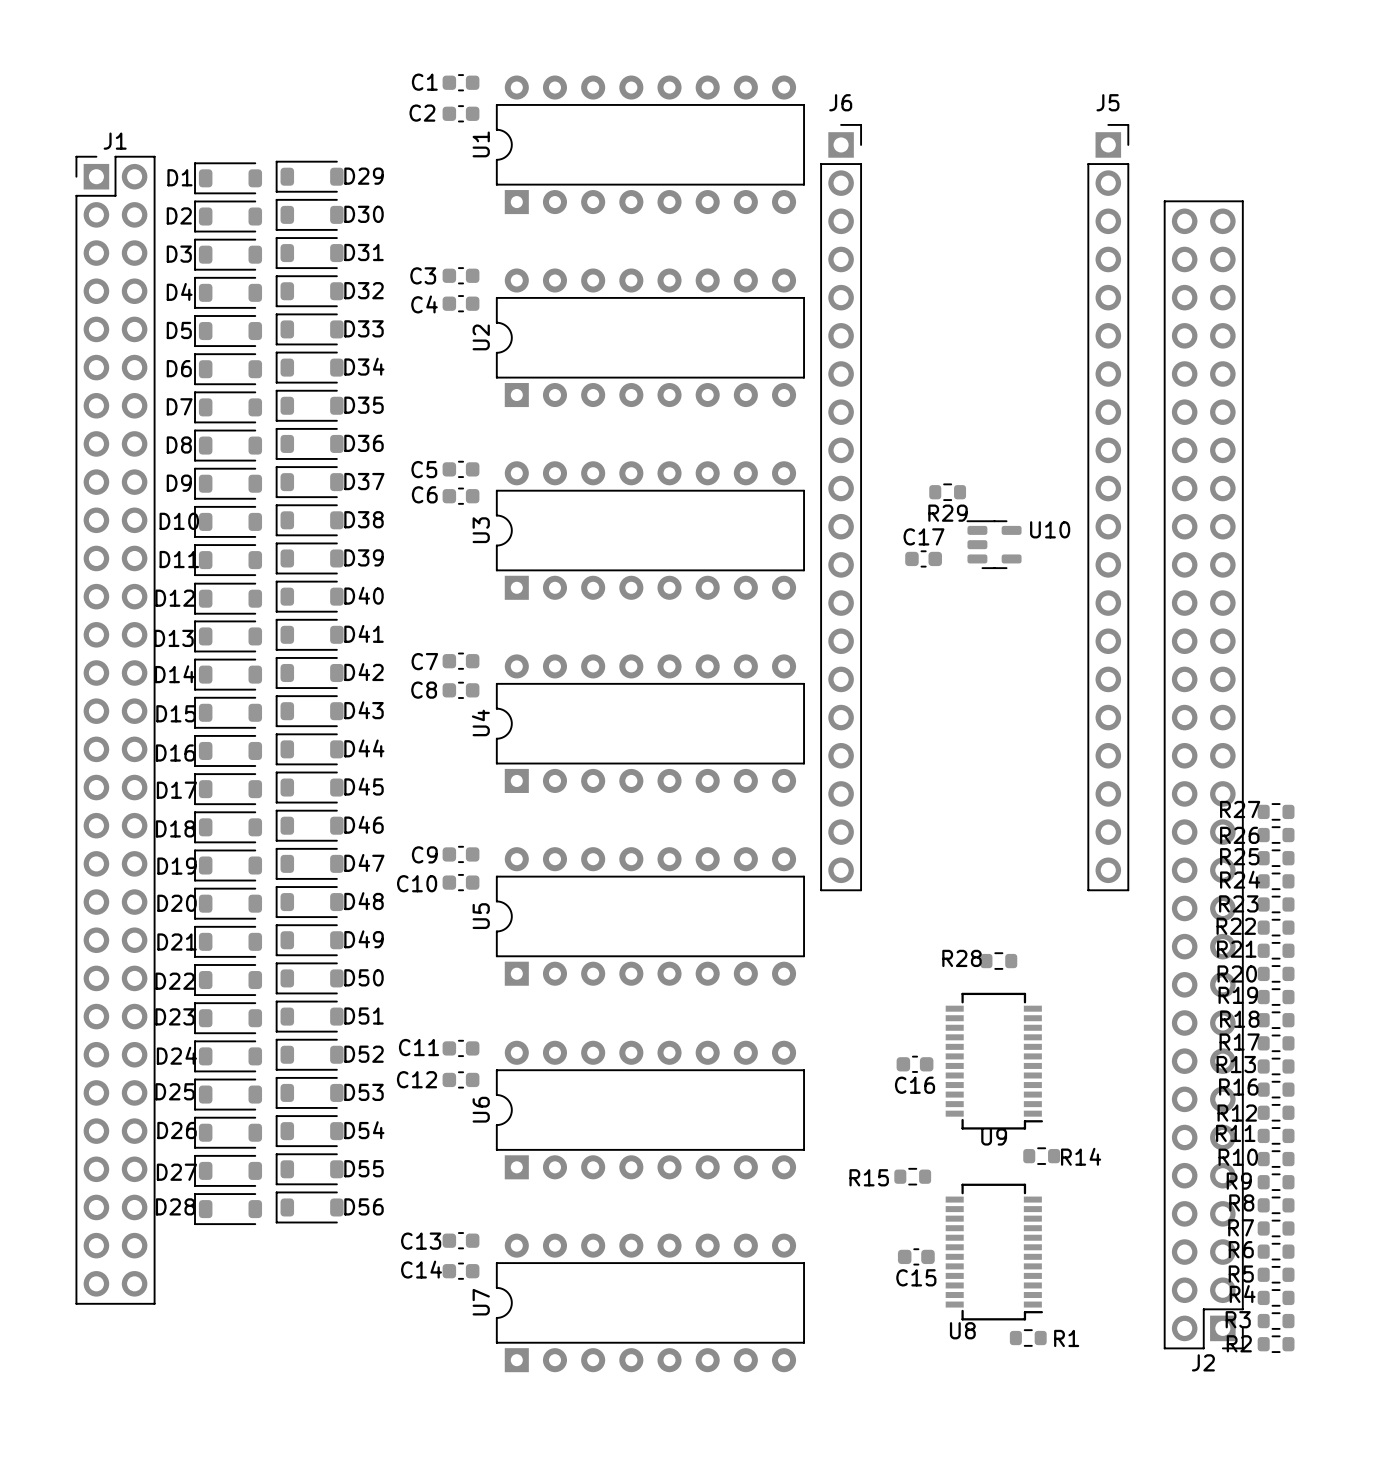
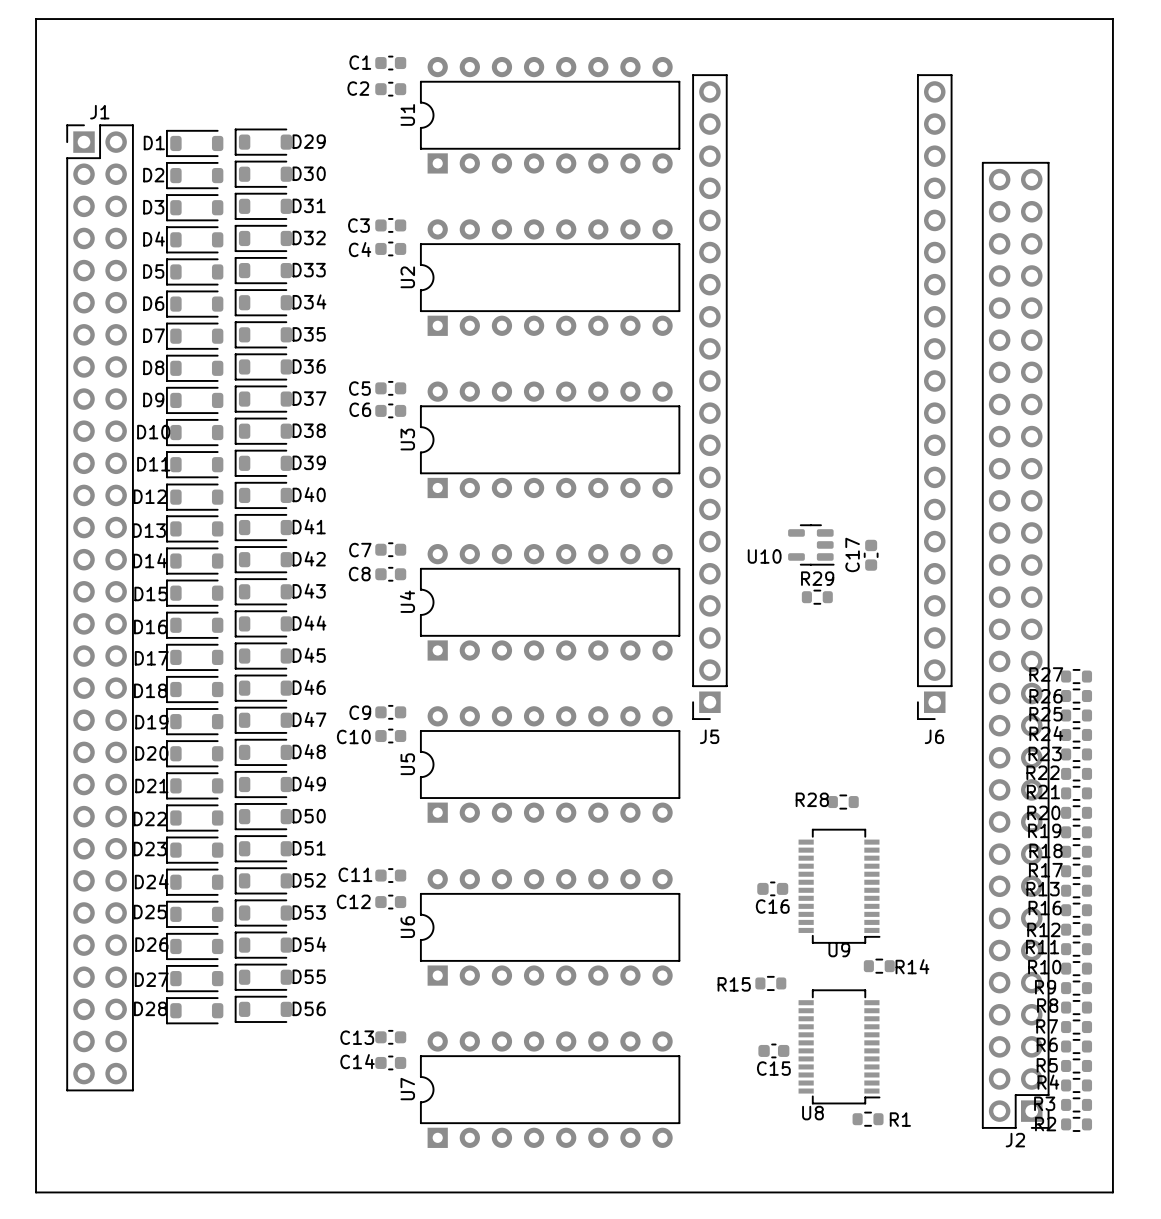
board edge: none -> (36, 19) (1112, 19) (1112, 1192) (36, 1192) (36, 19)
R29 position: (947, 492) -> (817, 597)
J6 rotation: 0° (841, 507) -> 180° (934, 397)
J5 rotation: 0° (1108, 507) -> 180° (709, 397)
R29 name position: R29 (948, 513) -> R29 (817, 578)
C17 name position: C17 (923, 536) -> C17 (852, 554)
U10 rotation: 0° (994, 544) -> 180° (811, 544)
U10 position: (994, 544) -> (811, 544)
C17 rotation: 0° (923, 558) -> 90° clockwise (871, 555)
C17 position: (923, 558) -> (871, 555)

